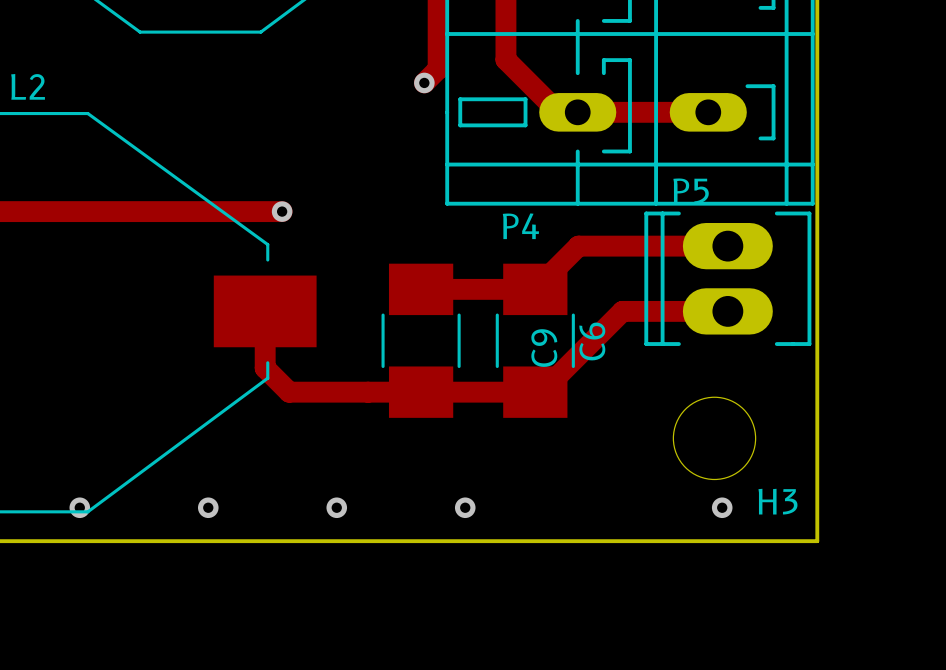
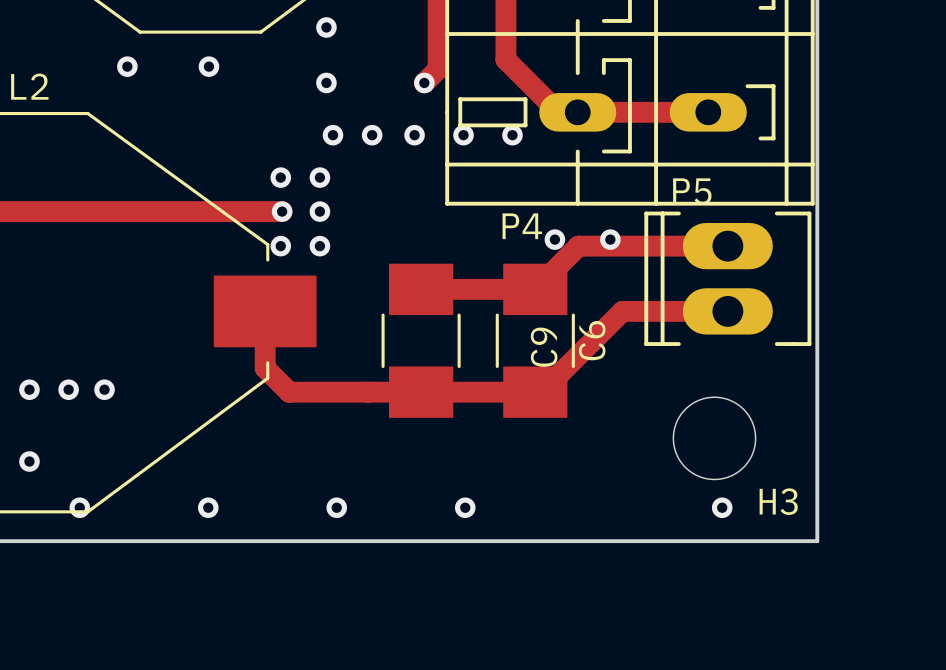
via: none -> (326, 27)
via: none -> (127, 66)
via: none -> (208, 66)
via: none -> (326, 82)
via: none -> (332, 135)
via: none -> (372, 135)
via: none -> (414, 135)
via: none -> (463, 135)
via: none -> (512, 135)
via: none -> (280, 177)
via: none -> (319, 177)
via: none -> (319, 211)
via: none -> (554, 239)
via: none -> (610, 239)
via: none -> (280, 246)
via: none -> (319, 246)
via: none -> (29, 389)
via: none -> (68, 389)
via: none -> (104, 389)
via: none -> (29, 461)

